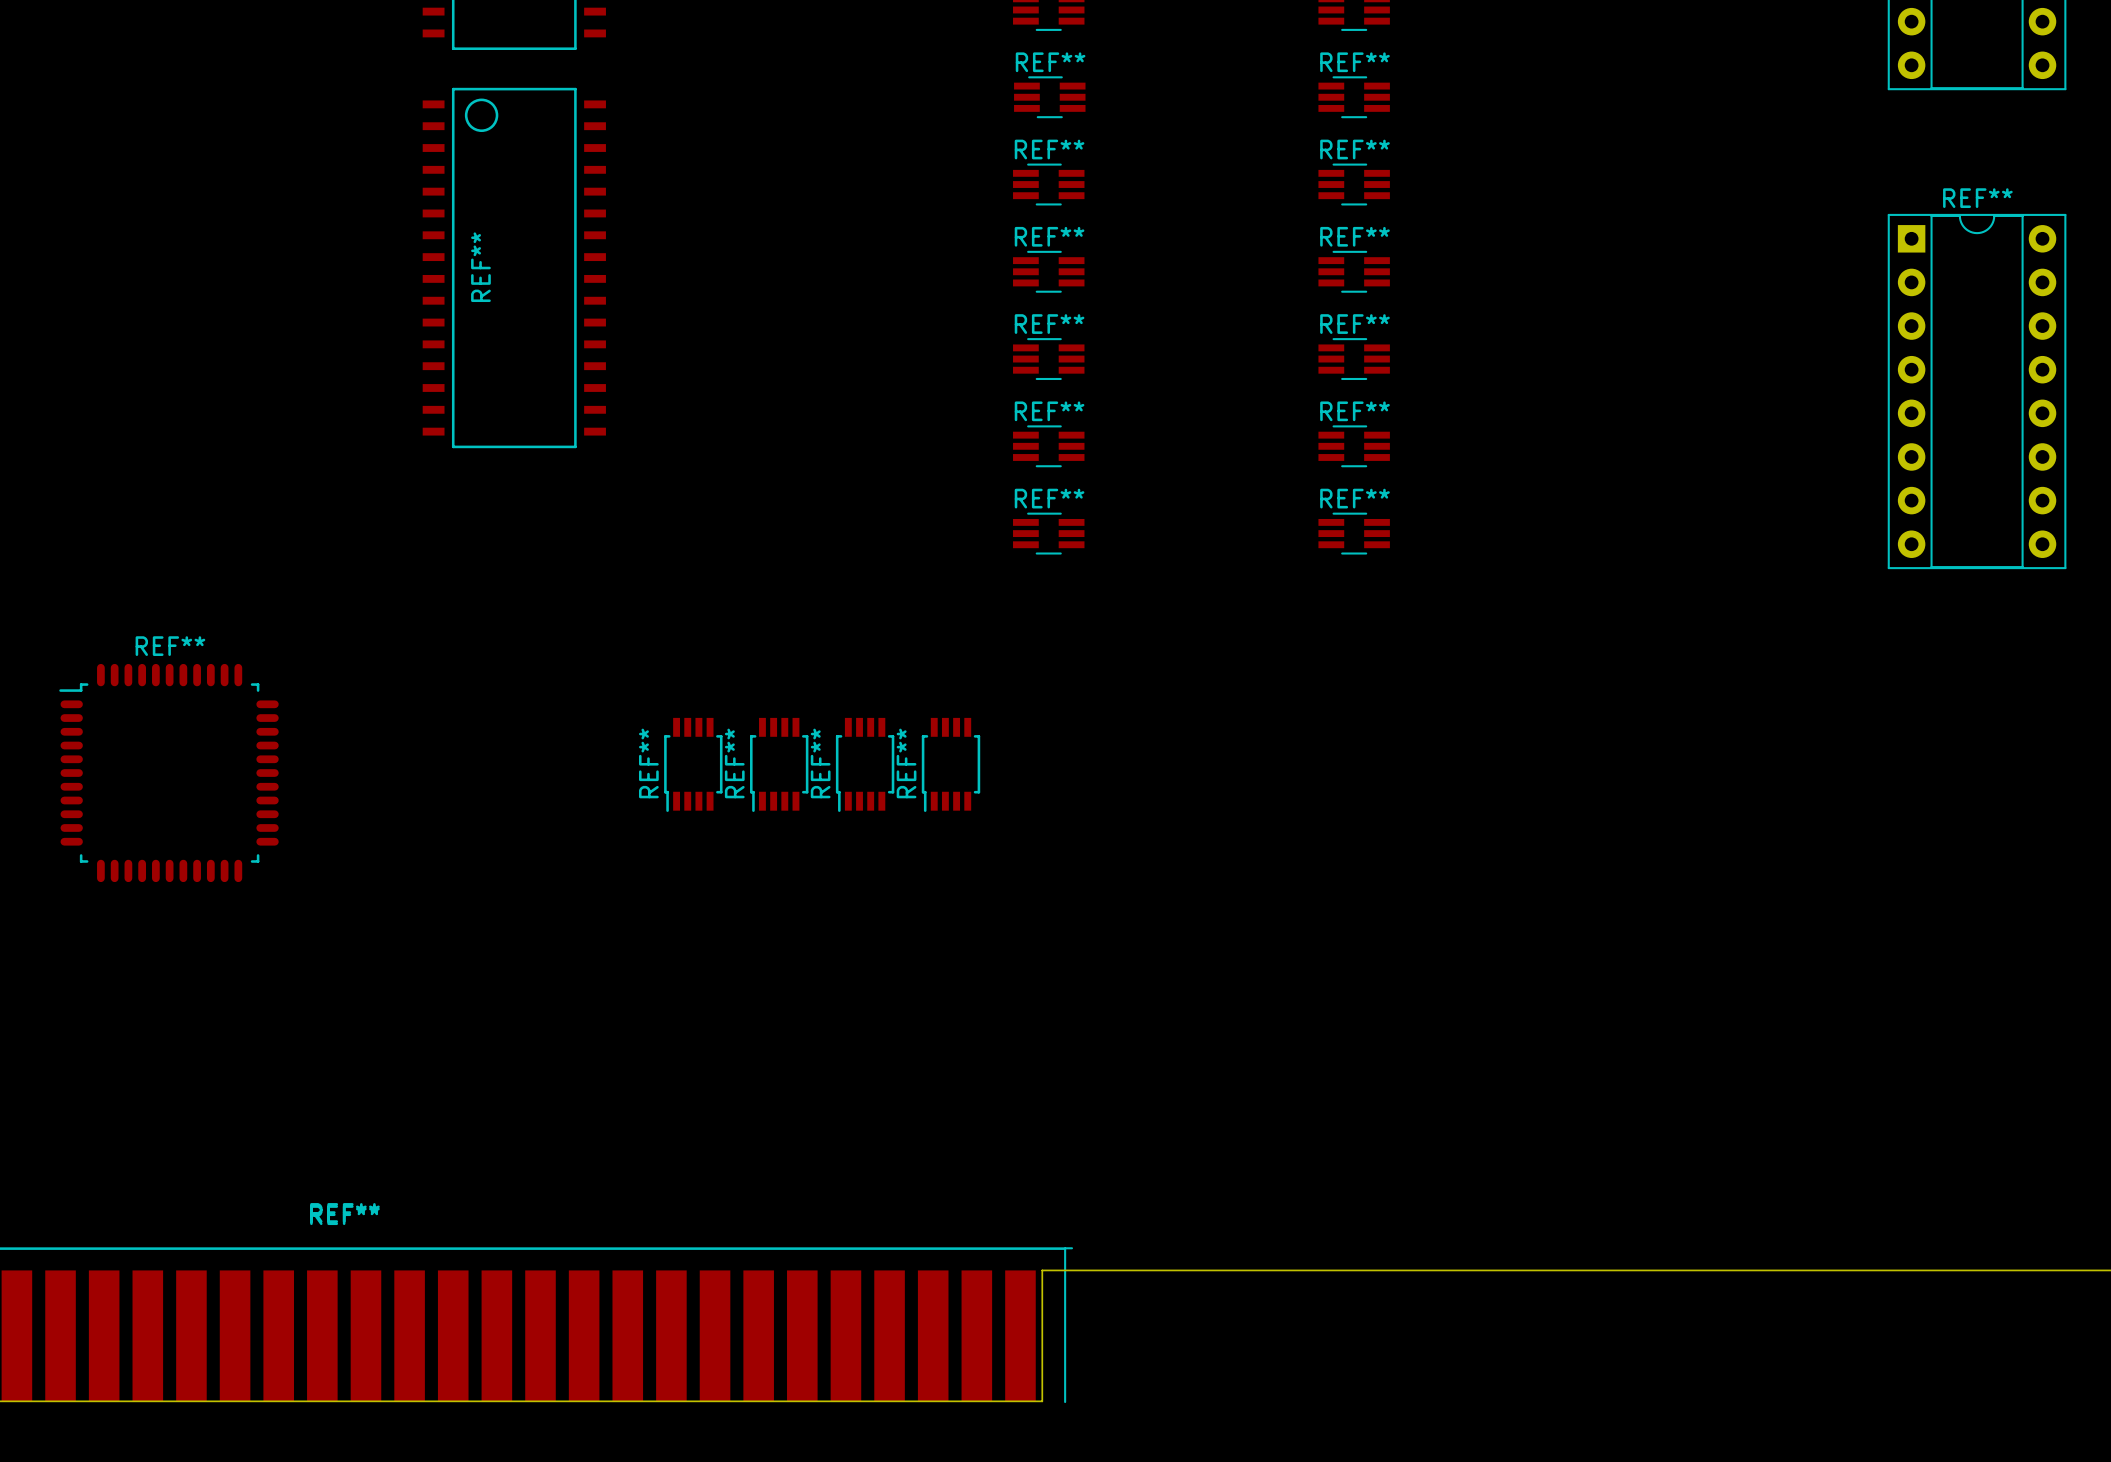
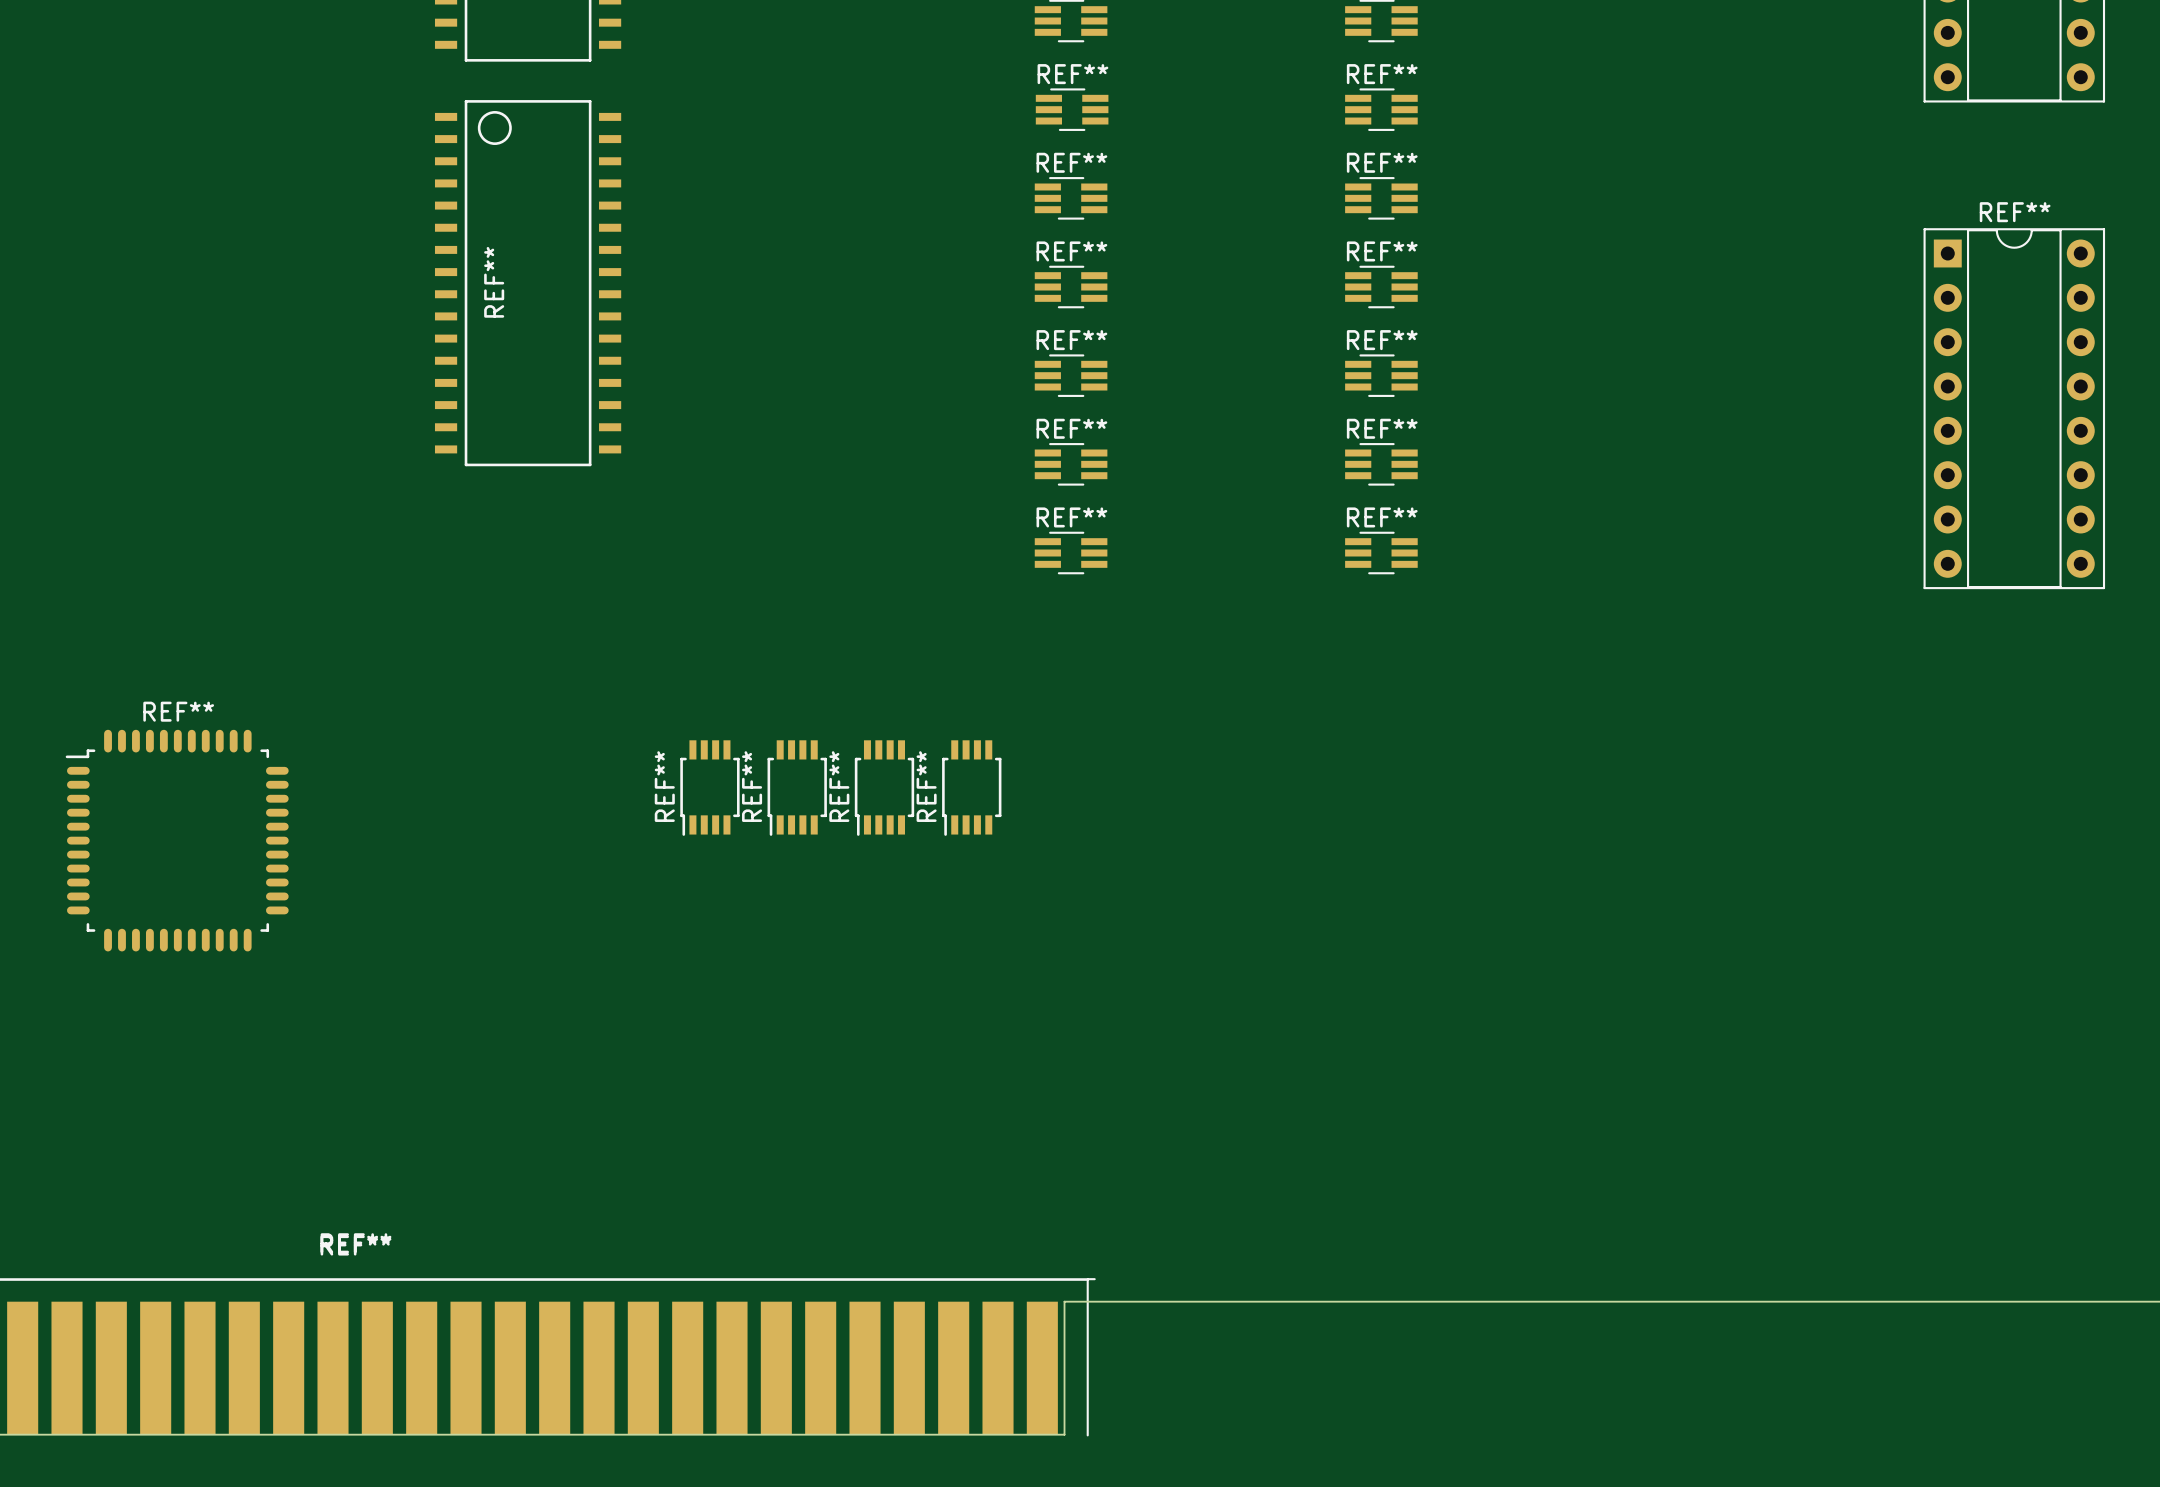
REF** position: (168, 773) -> (177, 840)

